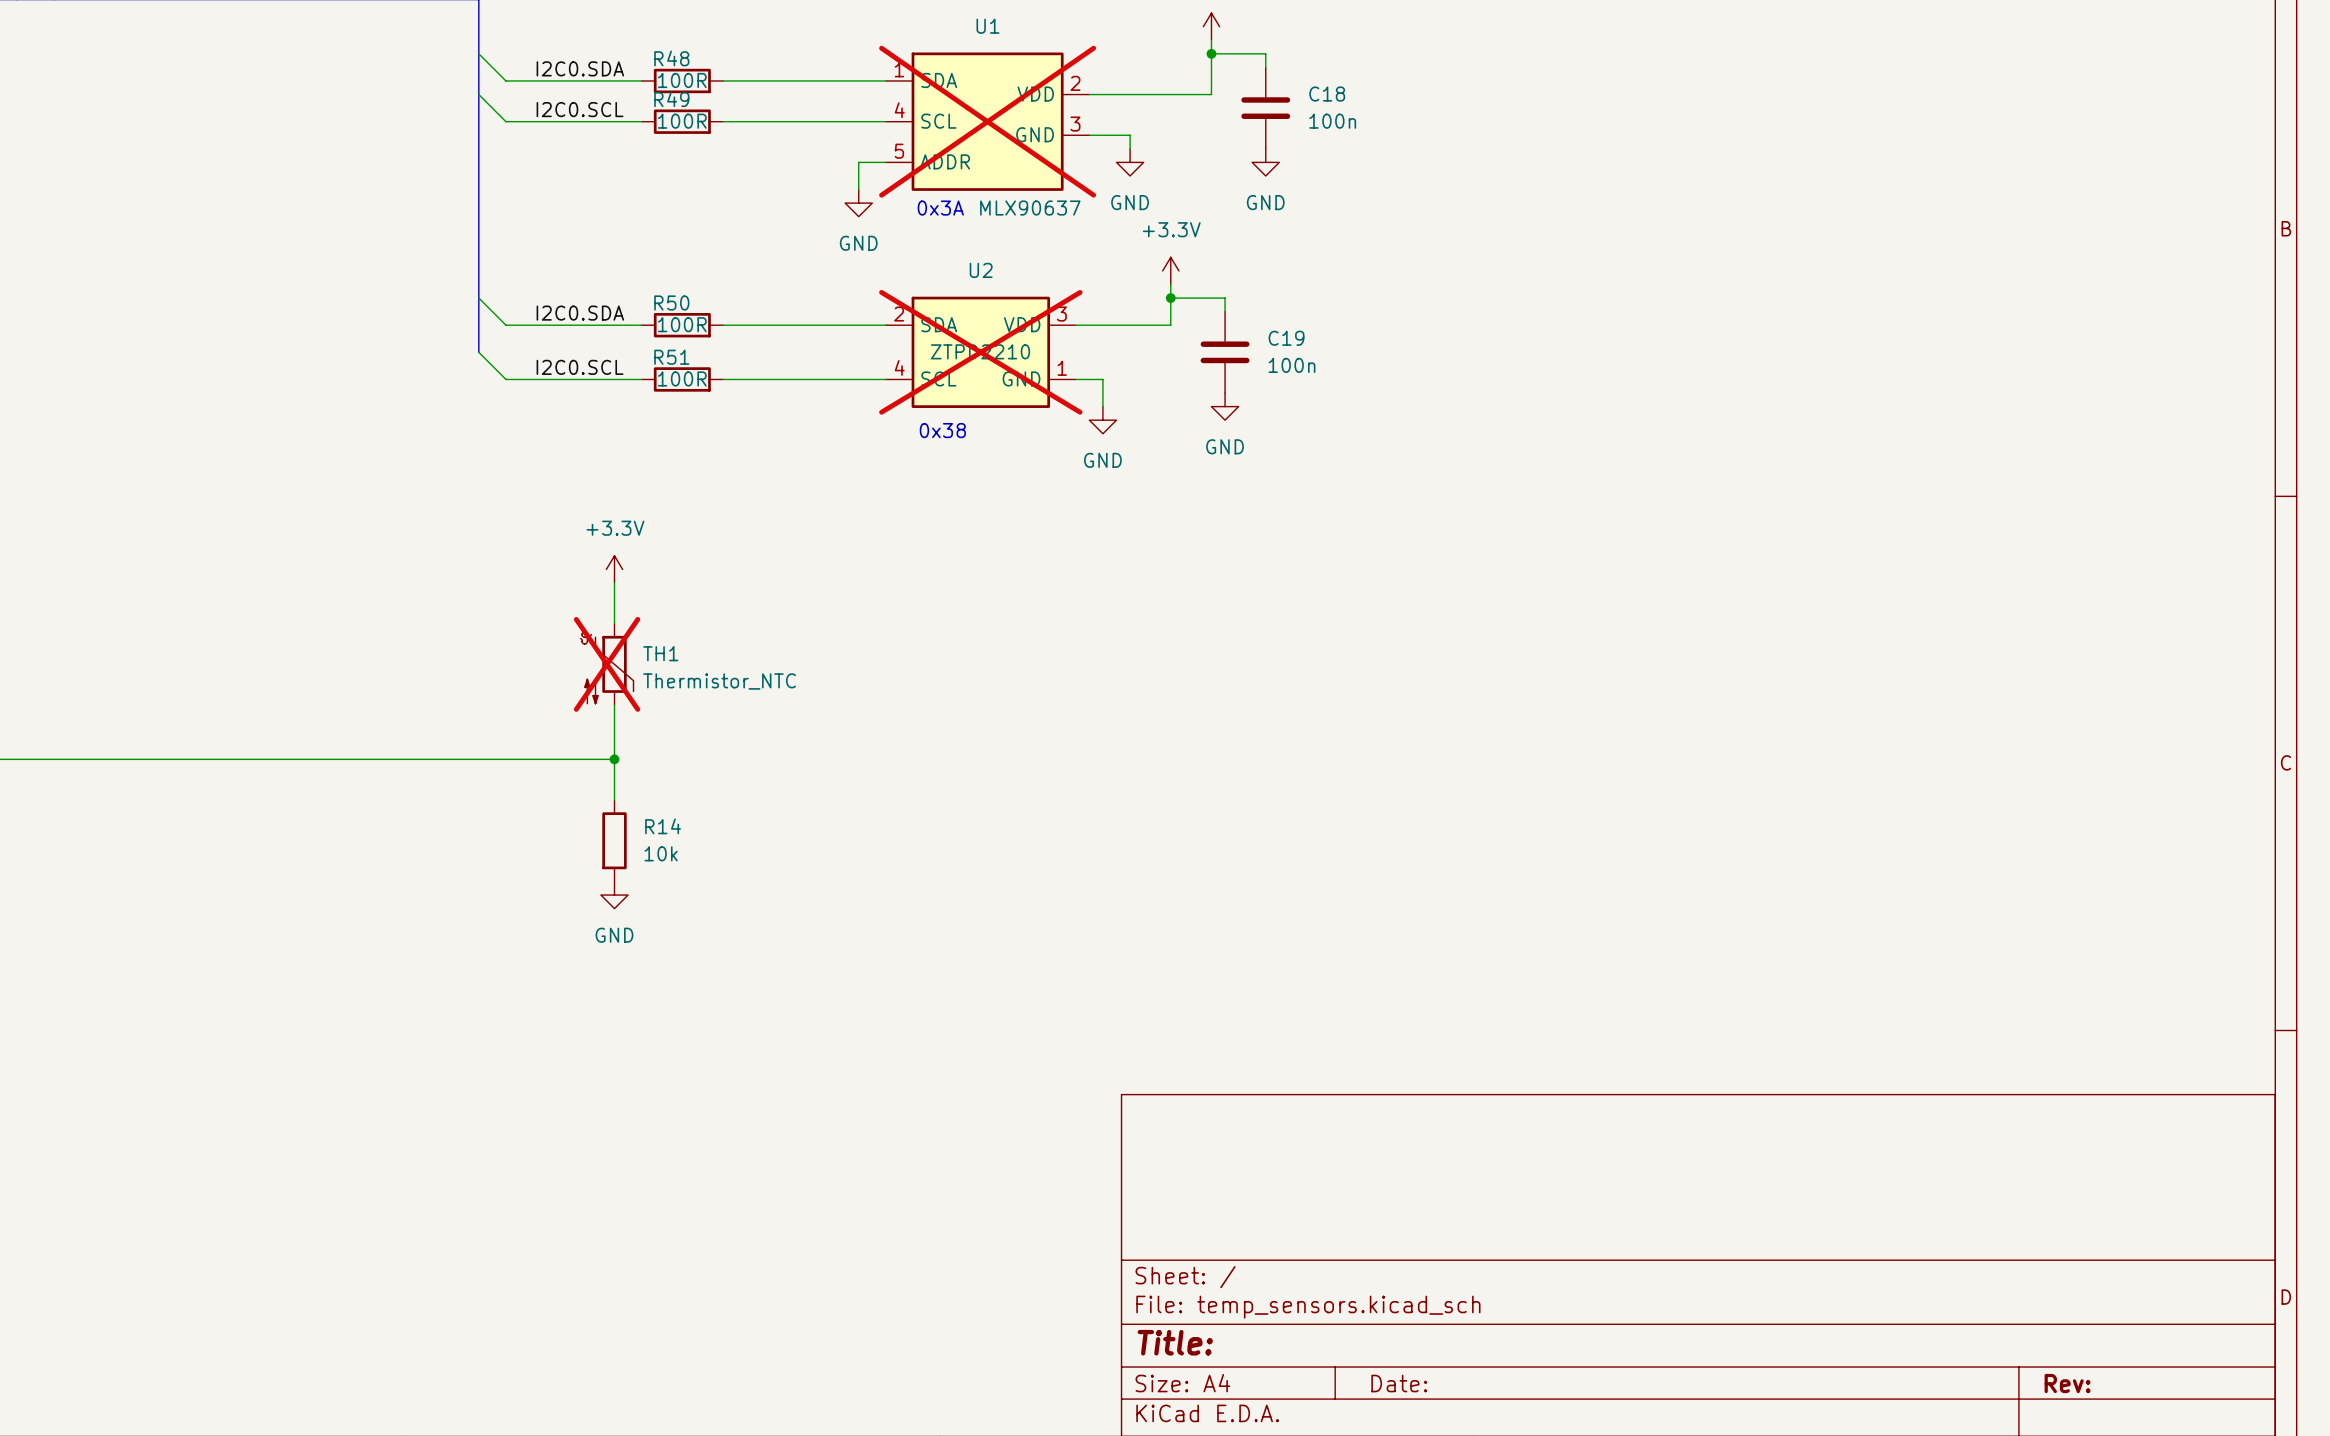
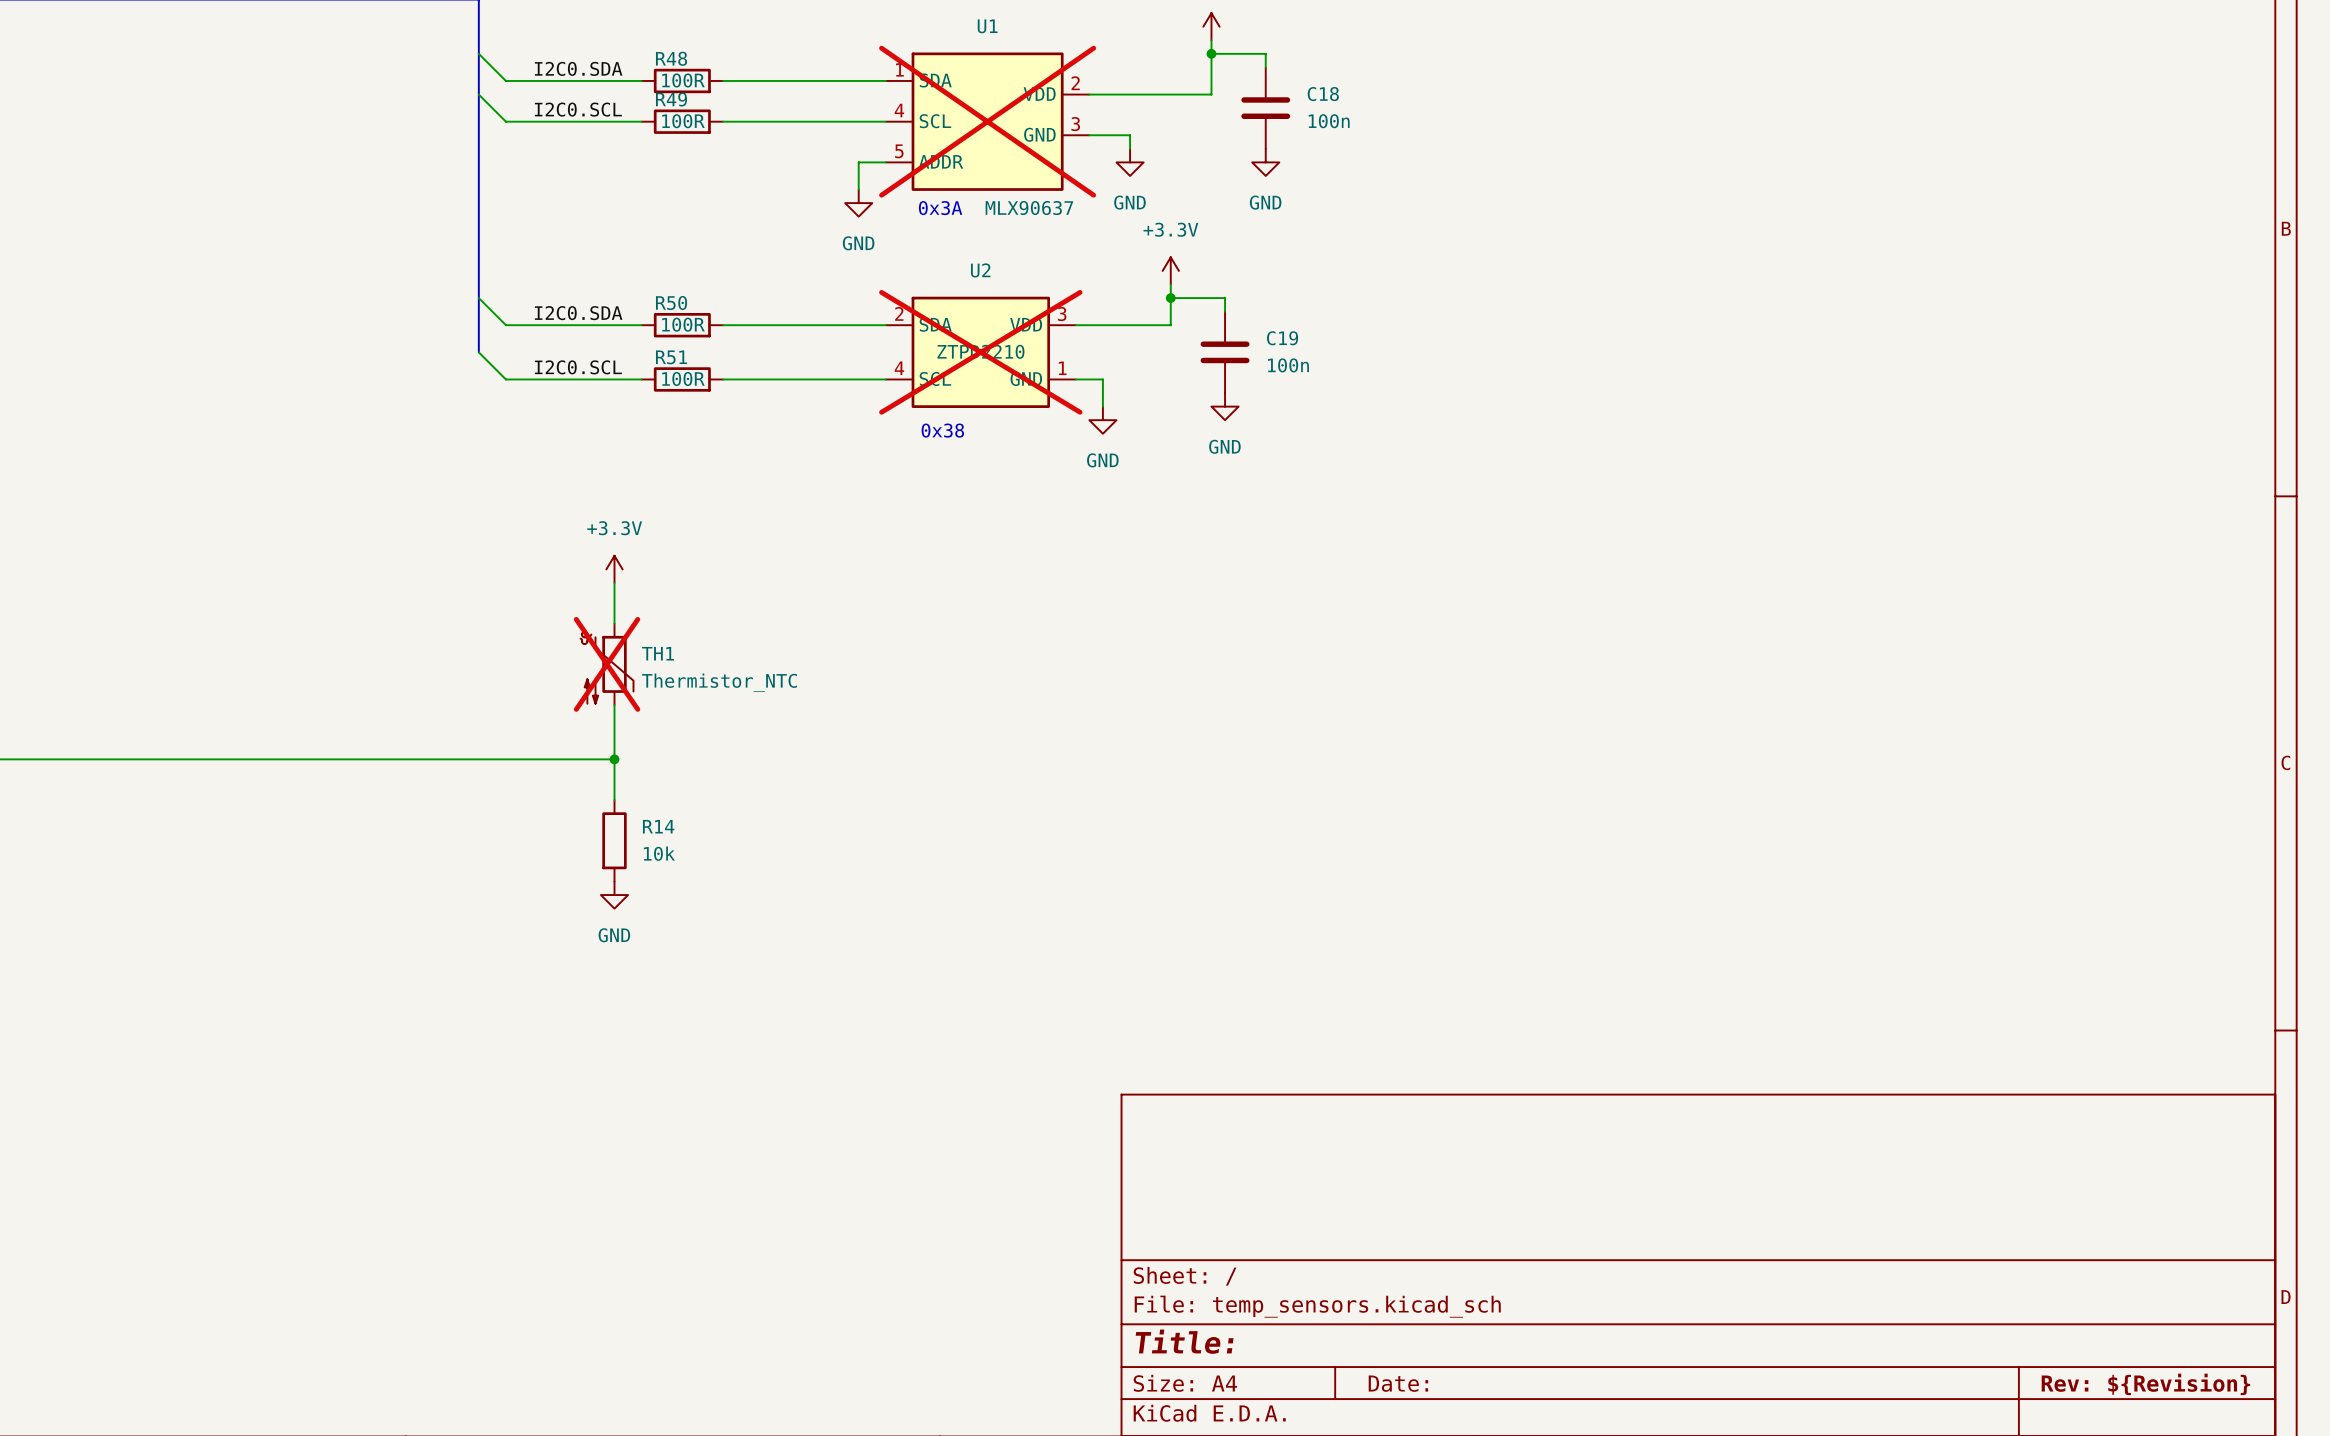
title block: Rev: (2067, 1383) -> Rev: ${Revision} (2145, 1384)

